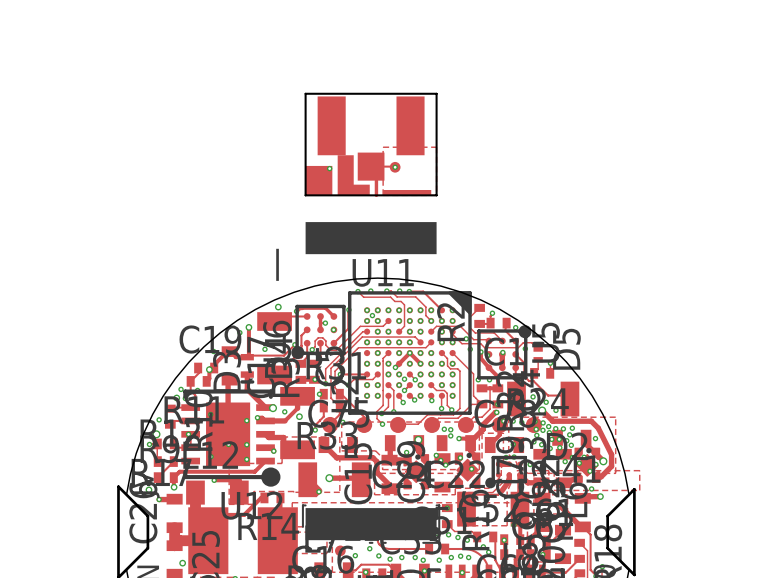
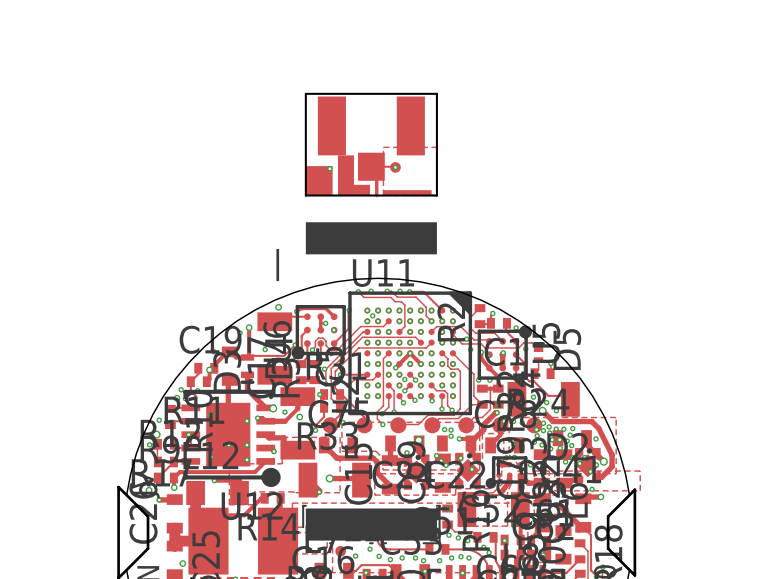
via position: (314, 379) -> (324, 369)

